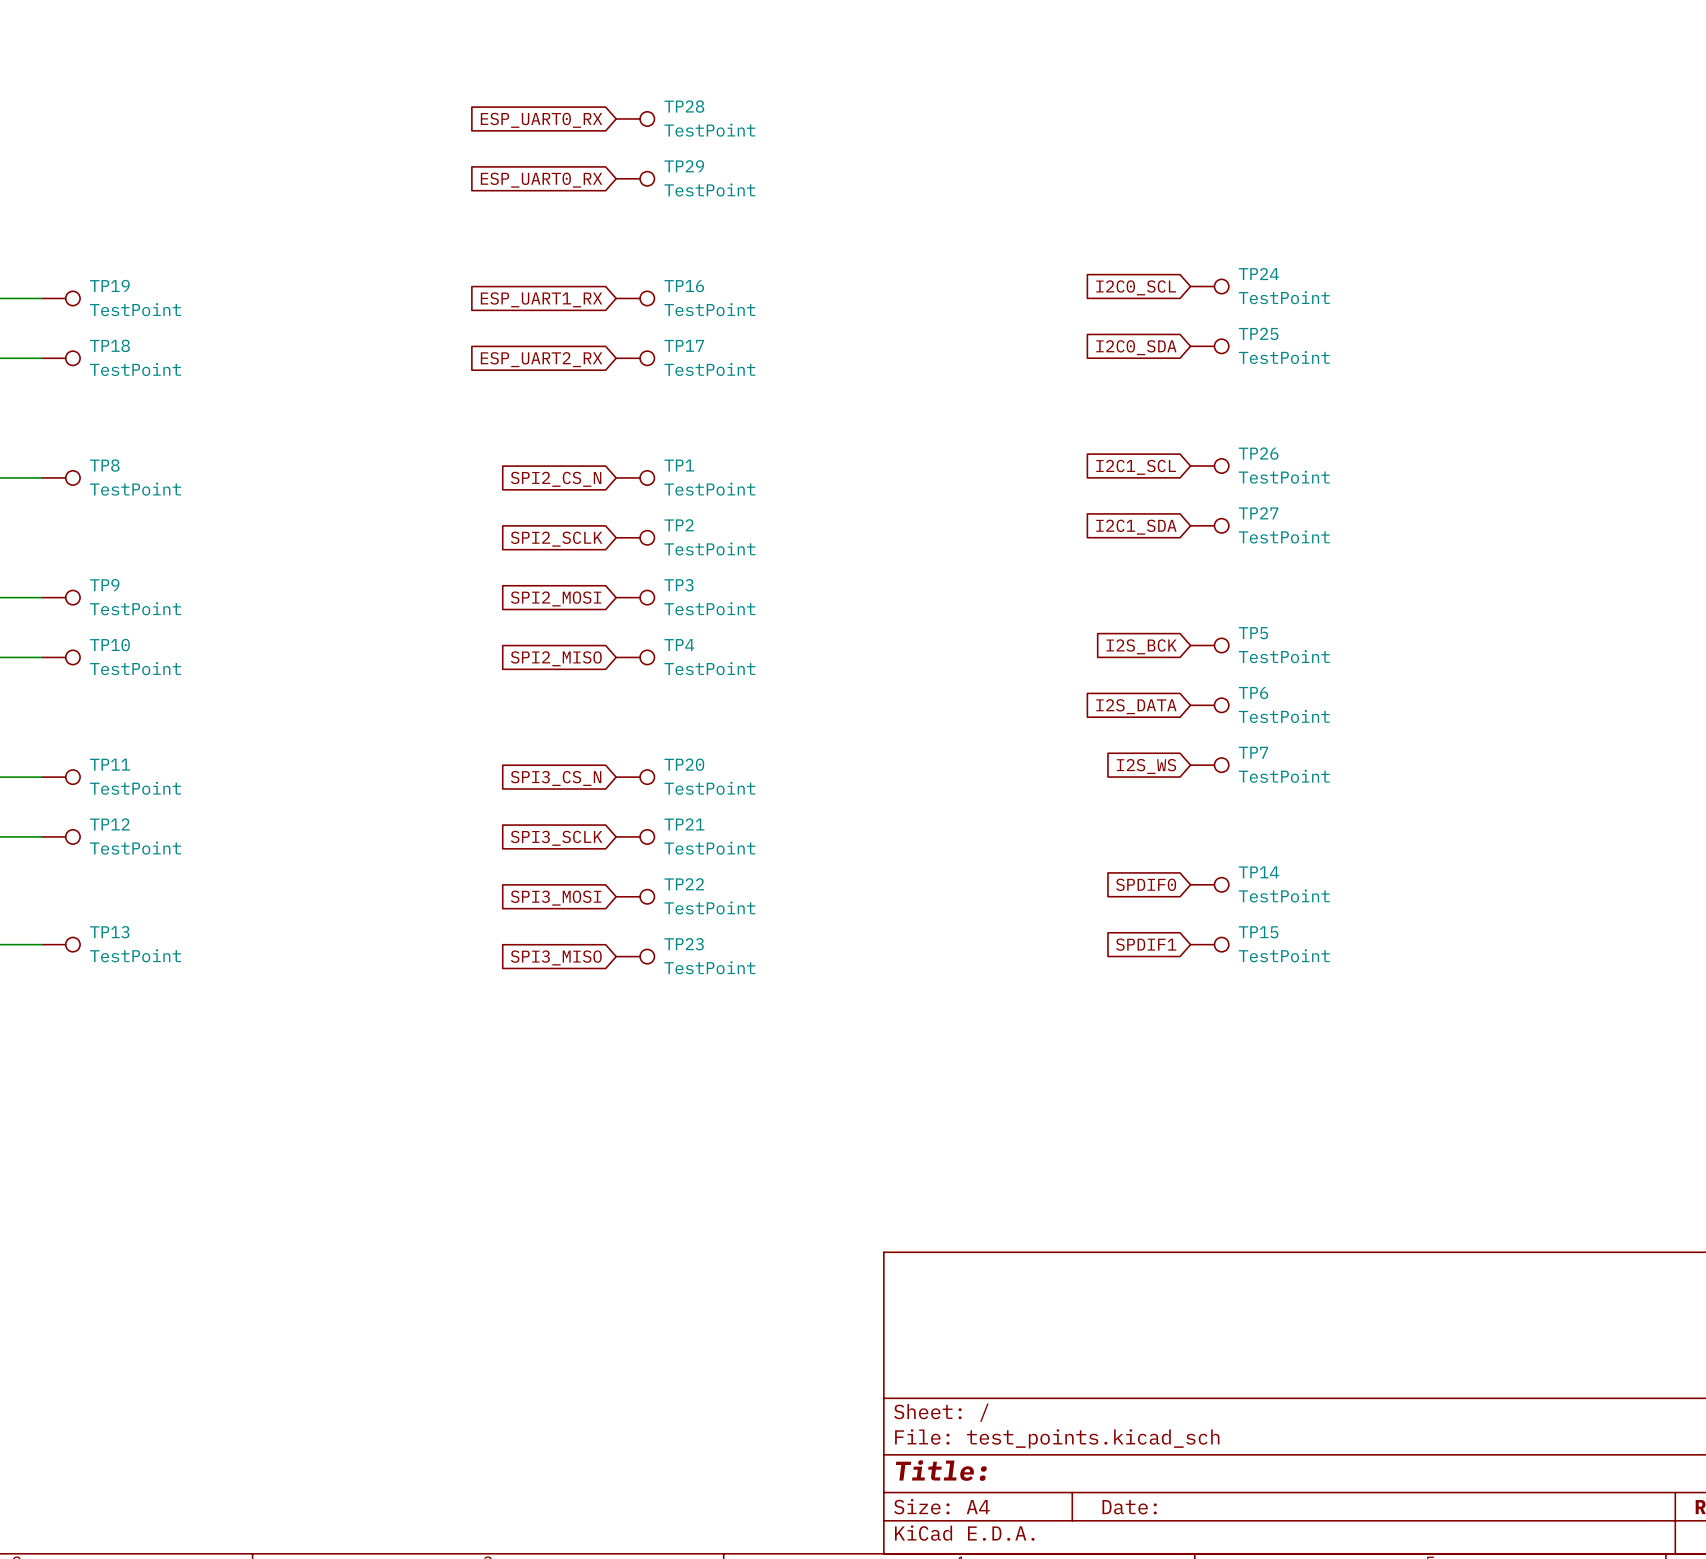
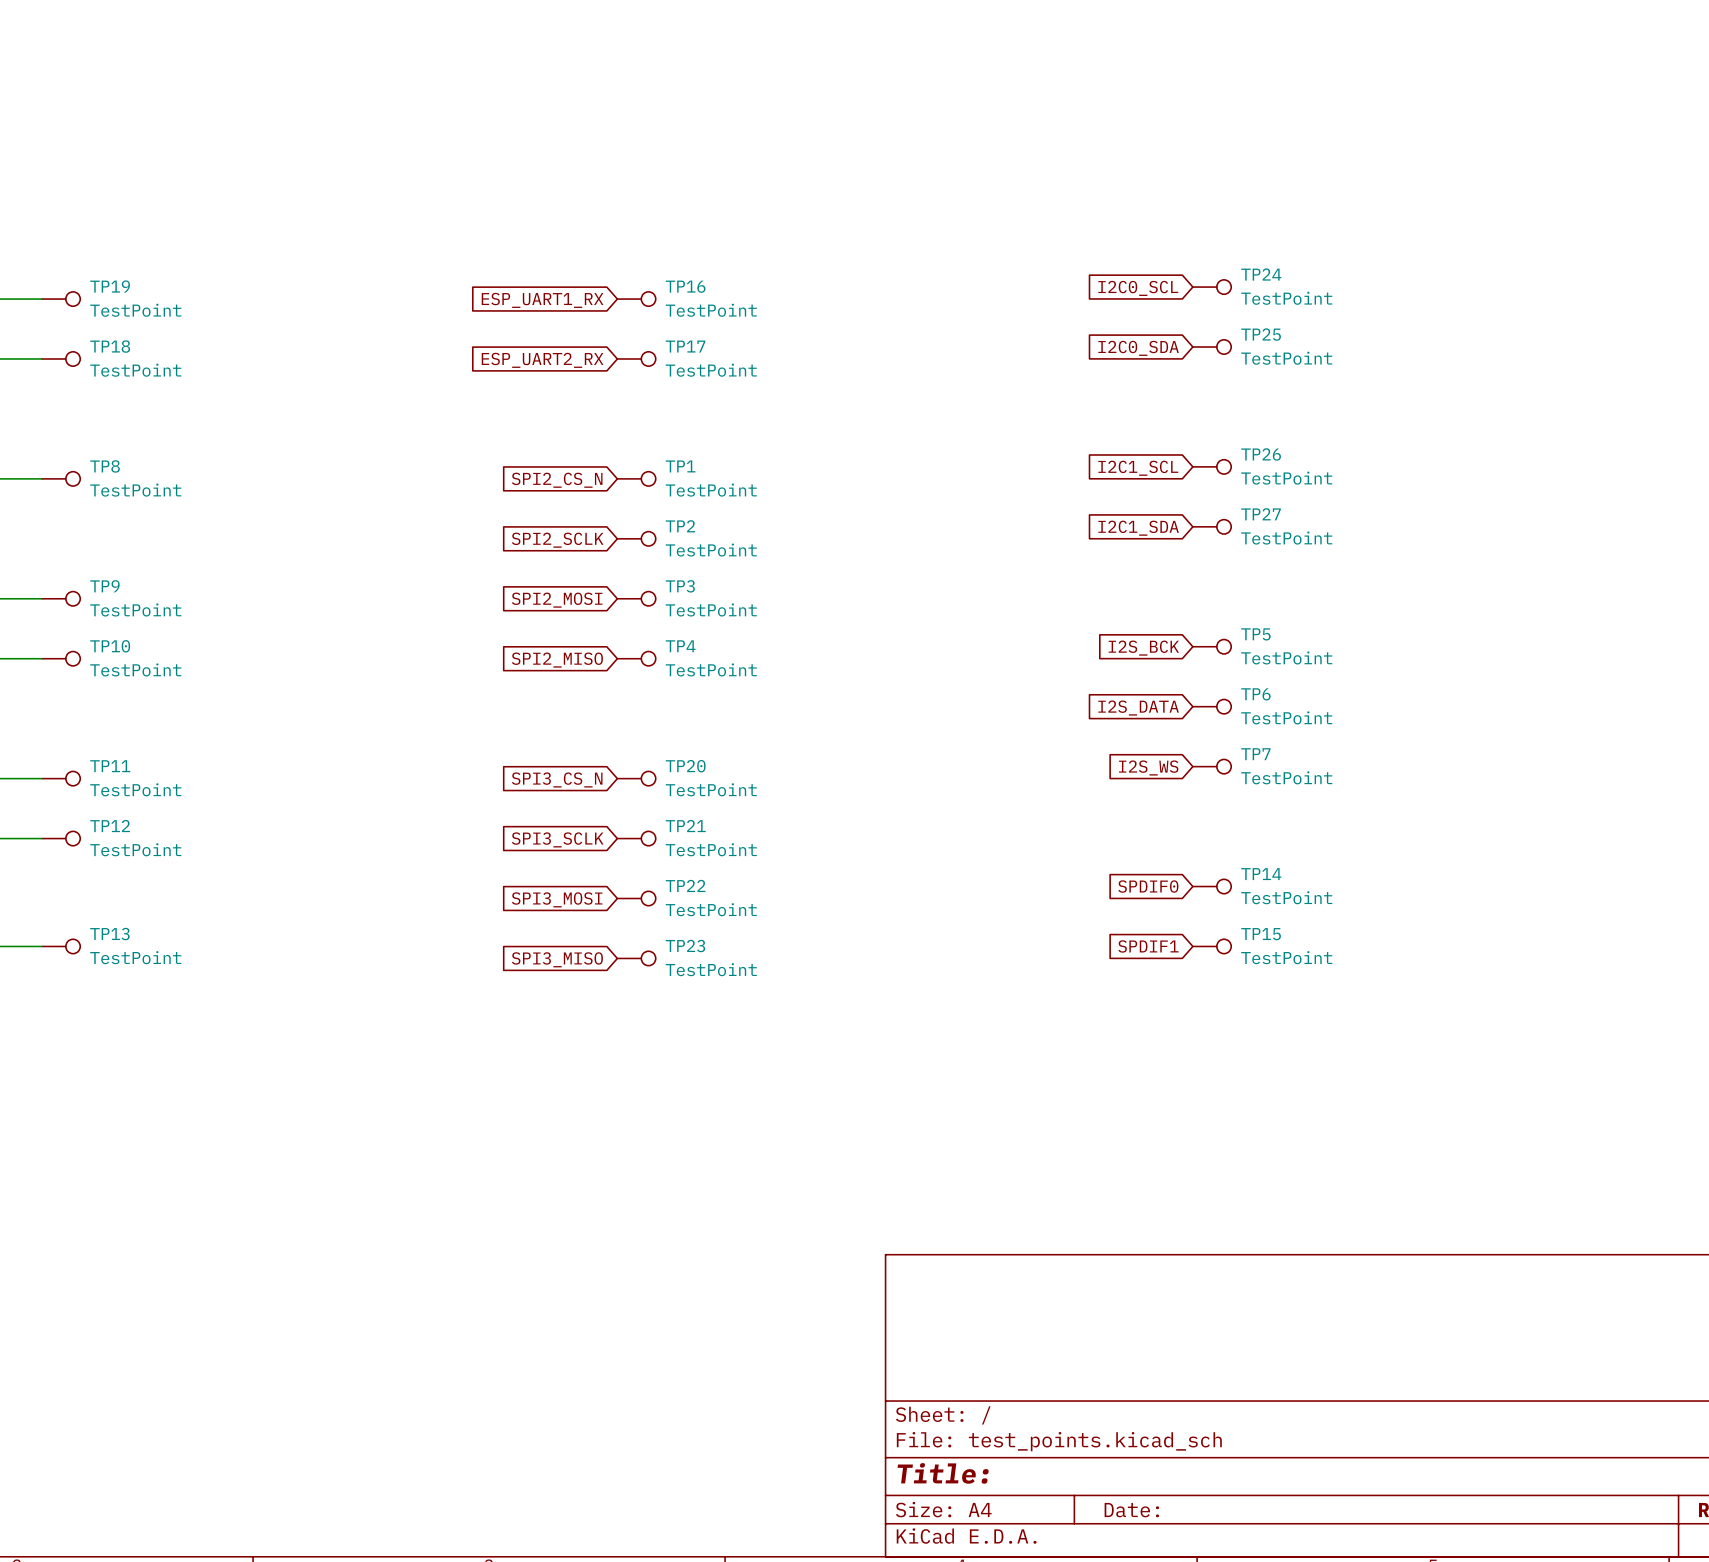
TP28: TestPoint (635, 118) -> none
global label: ESP_UART0_RX (541, 120) -> none
TP29: TestPoint (635, 178) -> none
global label: ESP_UART0_RX (541, 180) -> none

